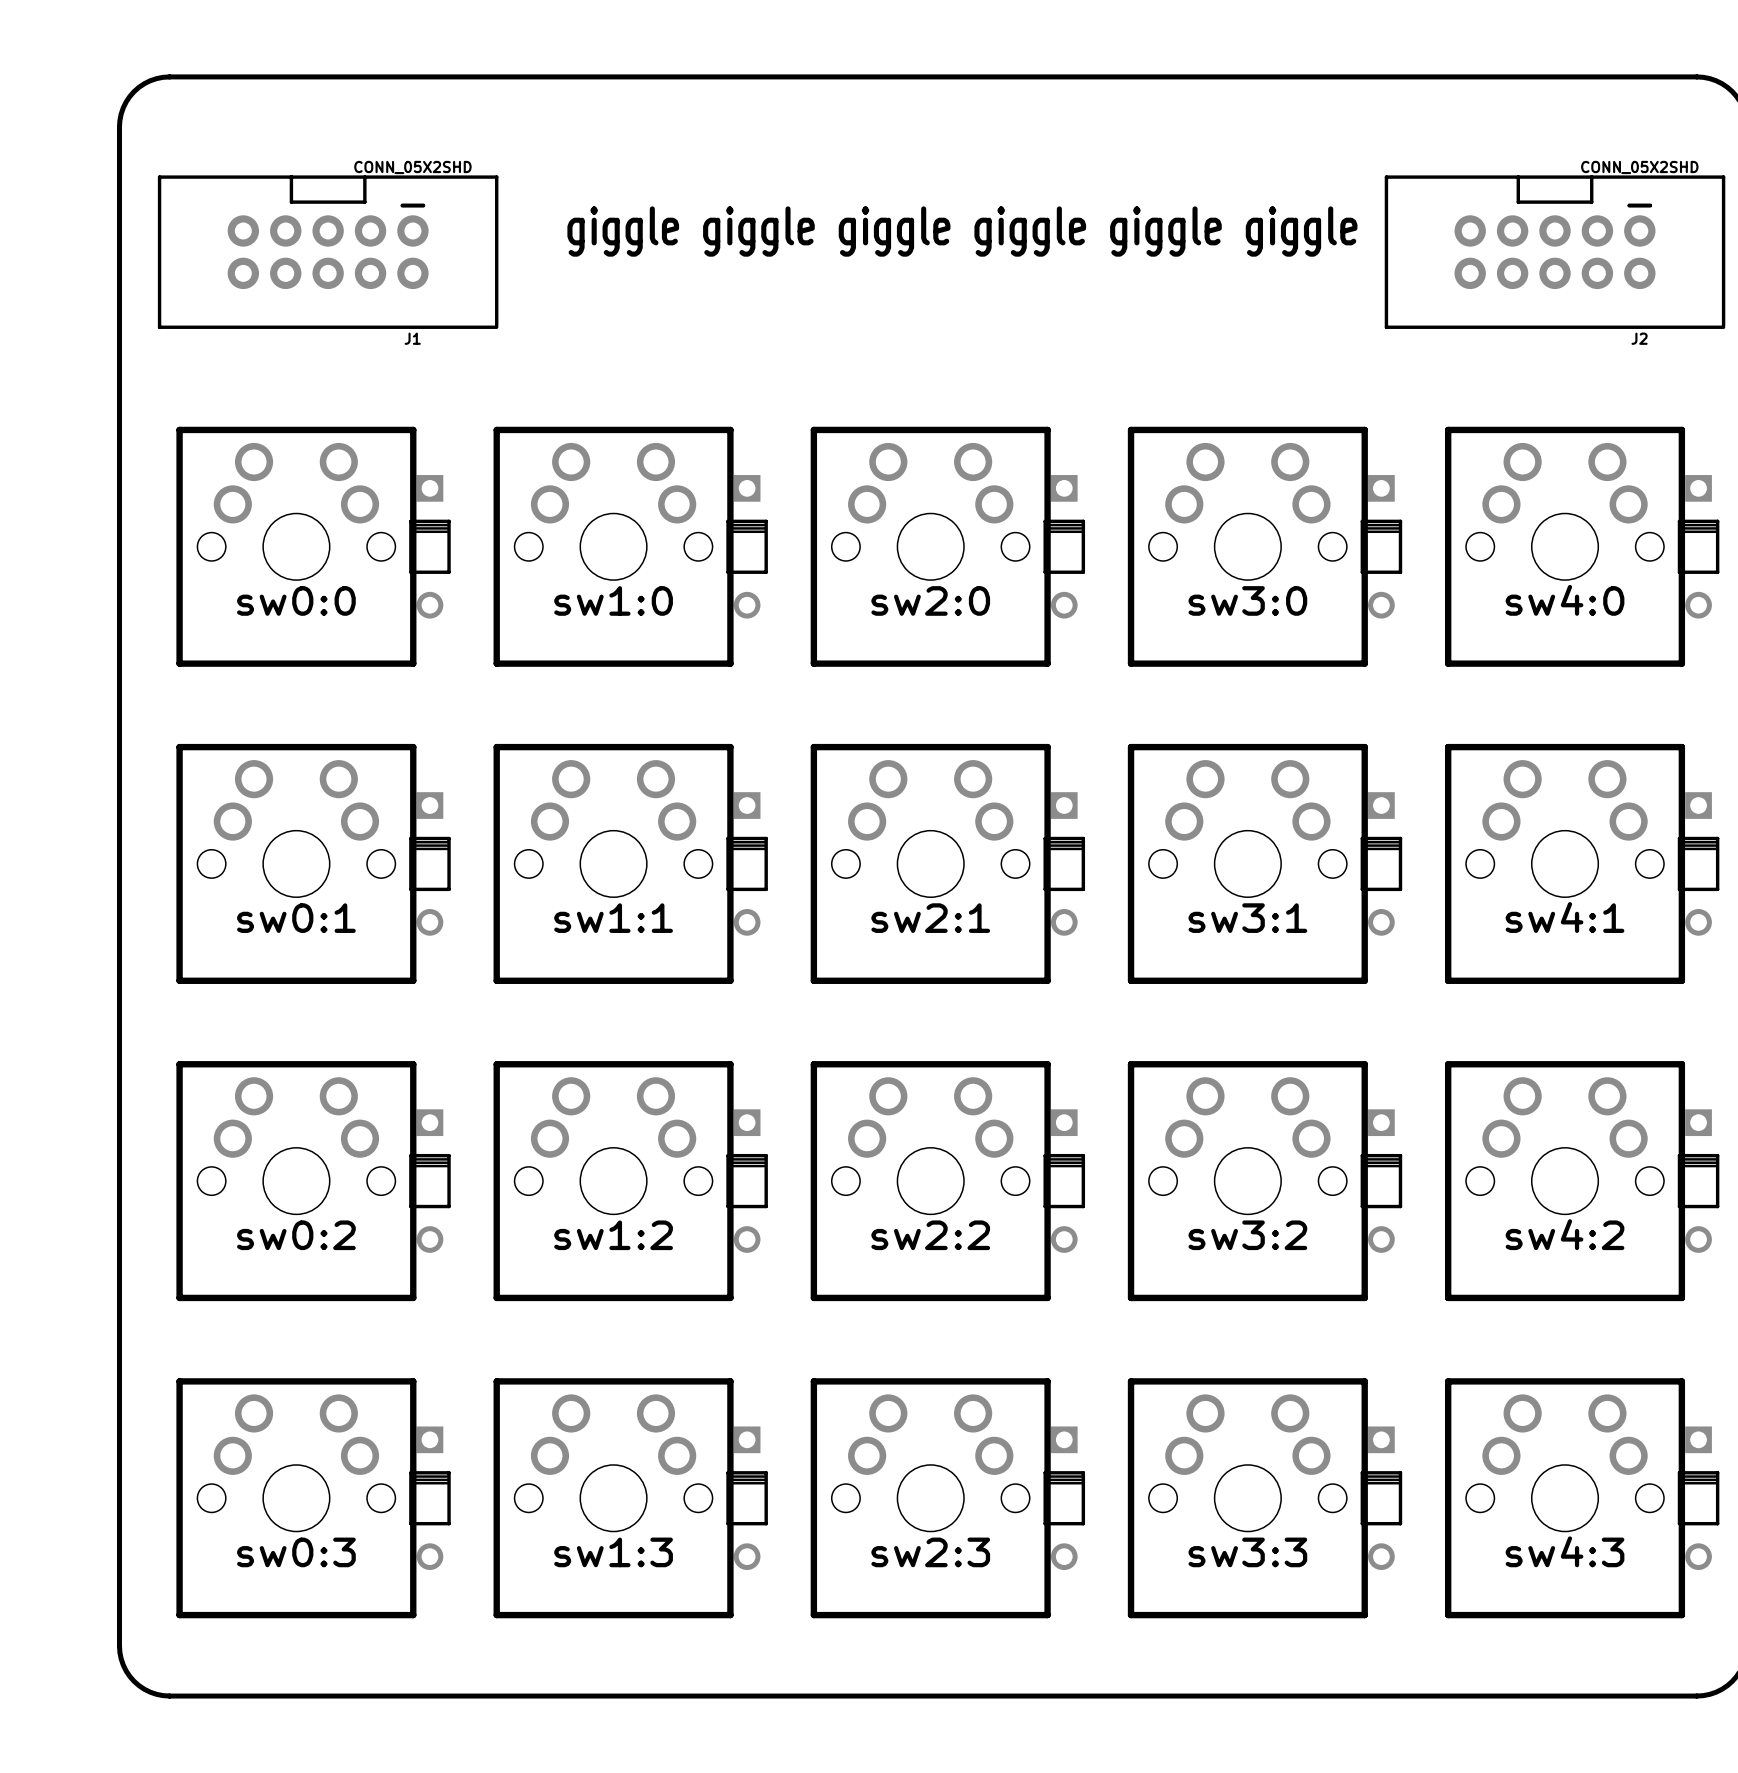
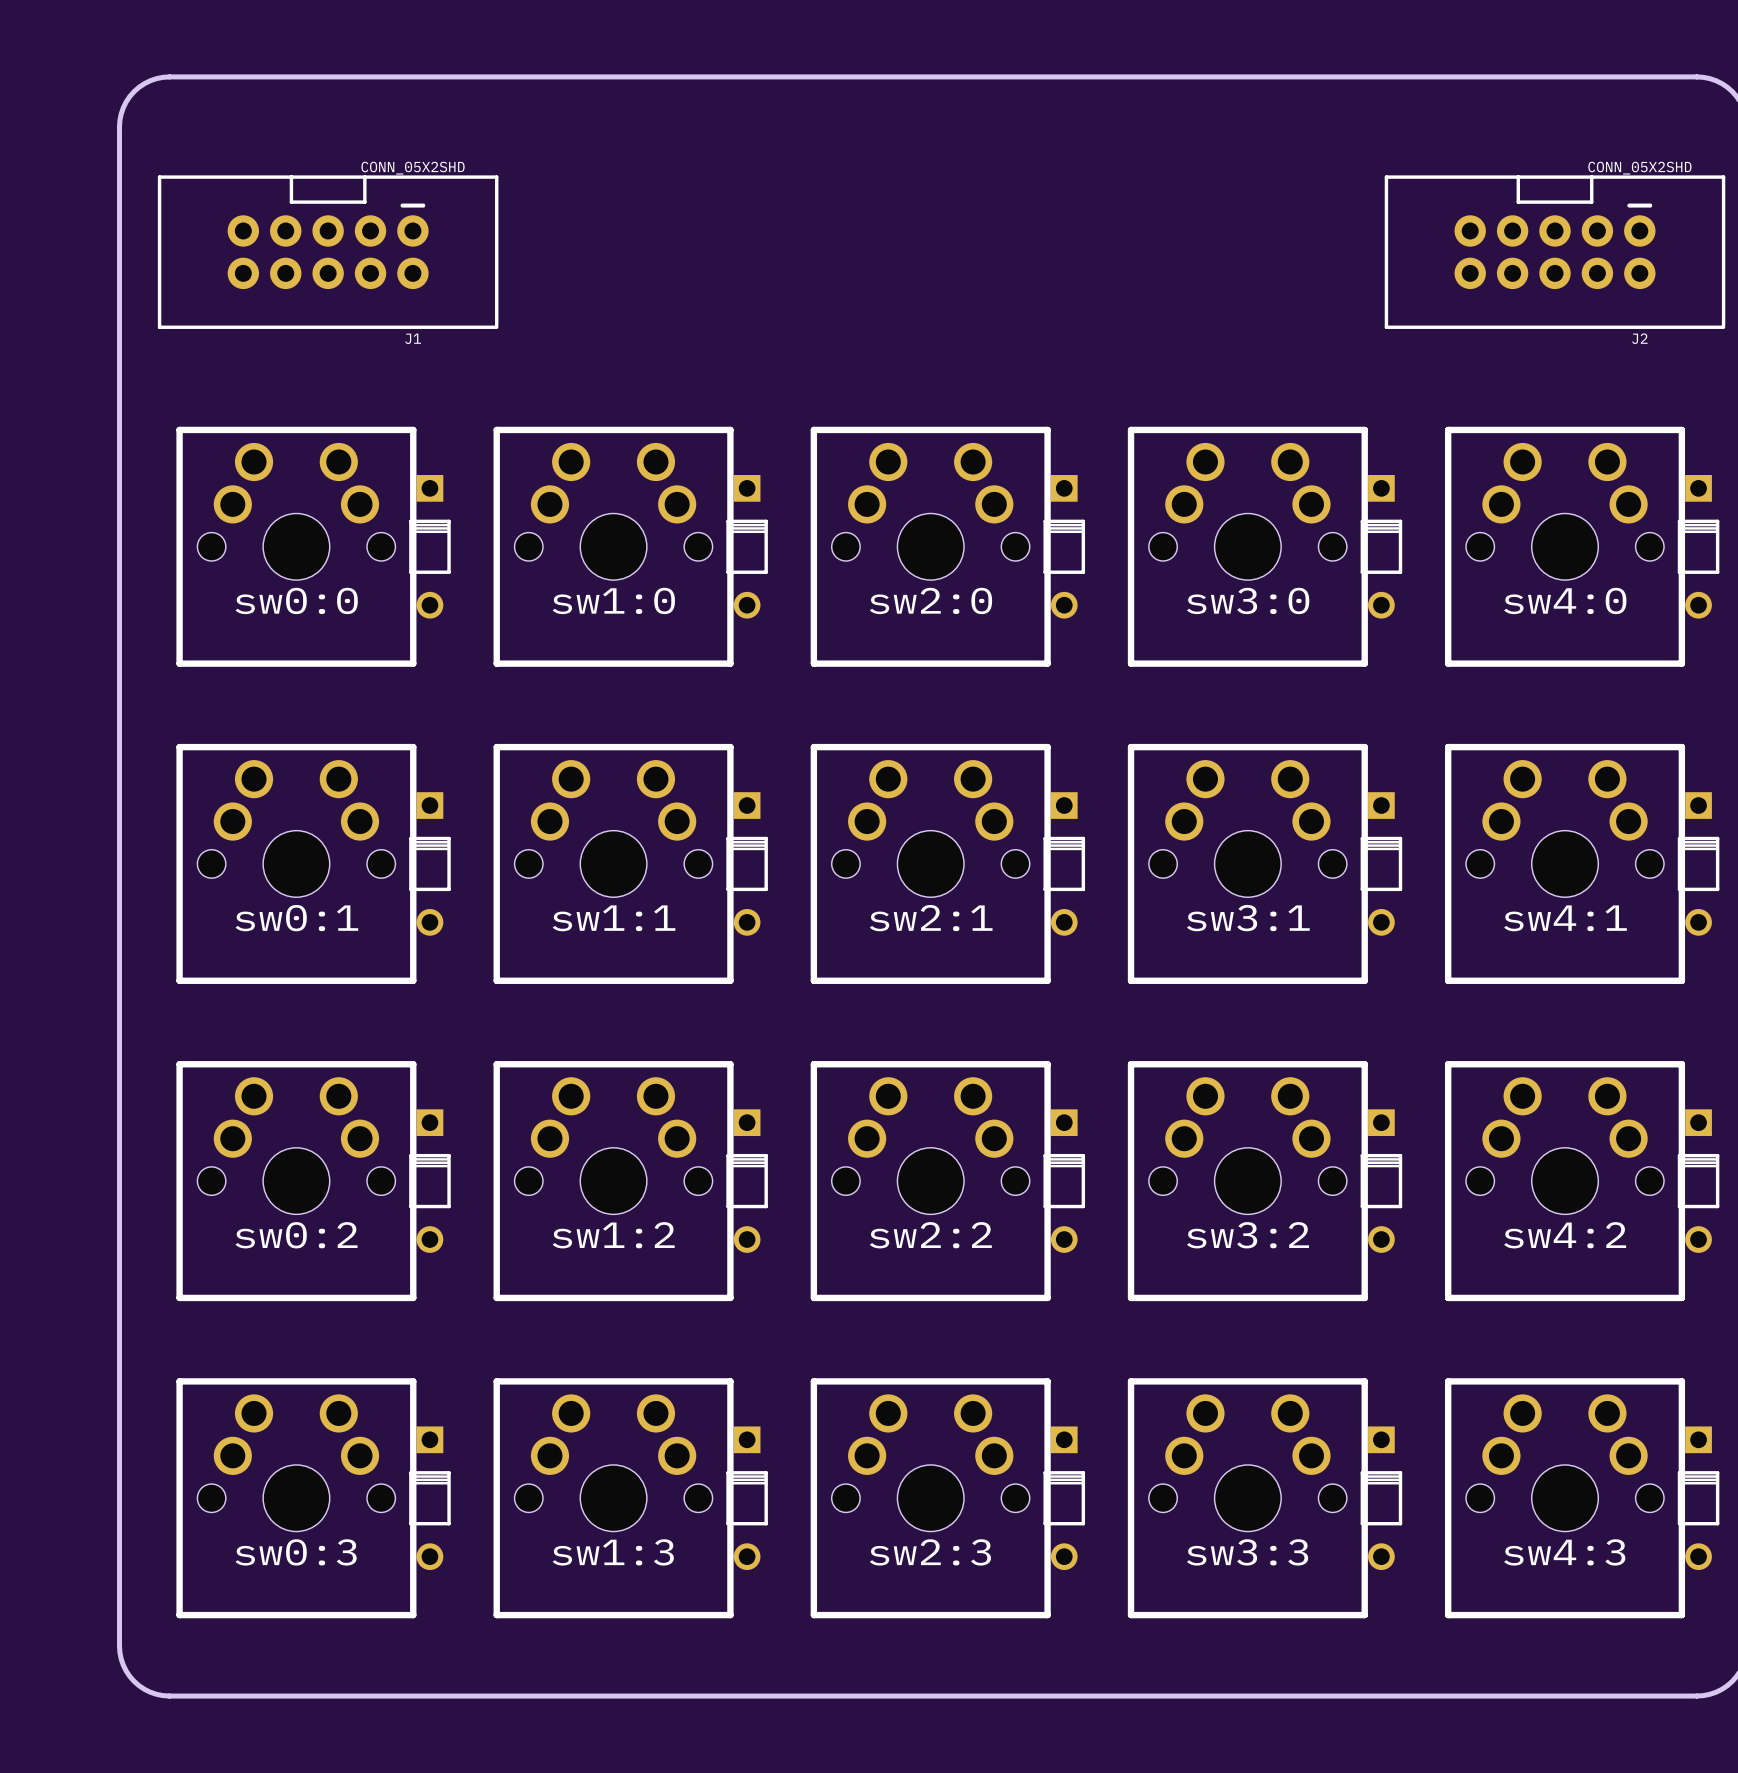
text: giggle giggle giggle giggle giggle giggle (962, 231) -> none

